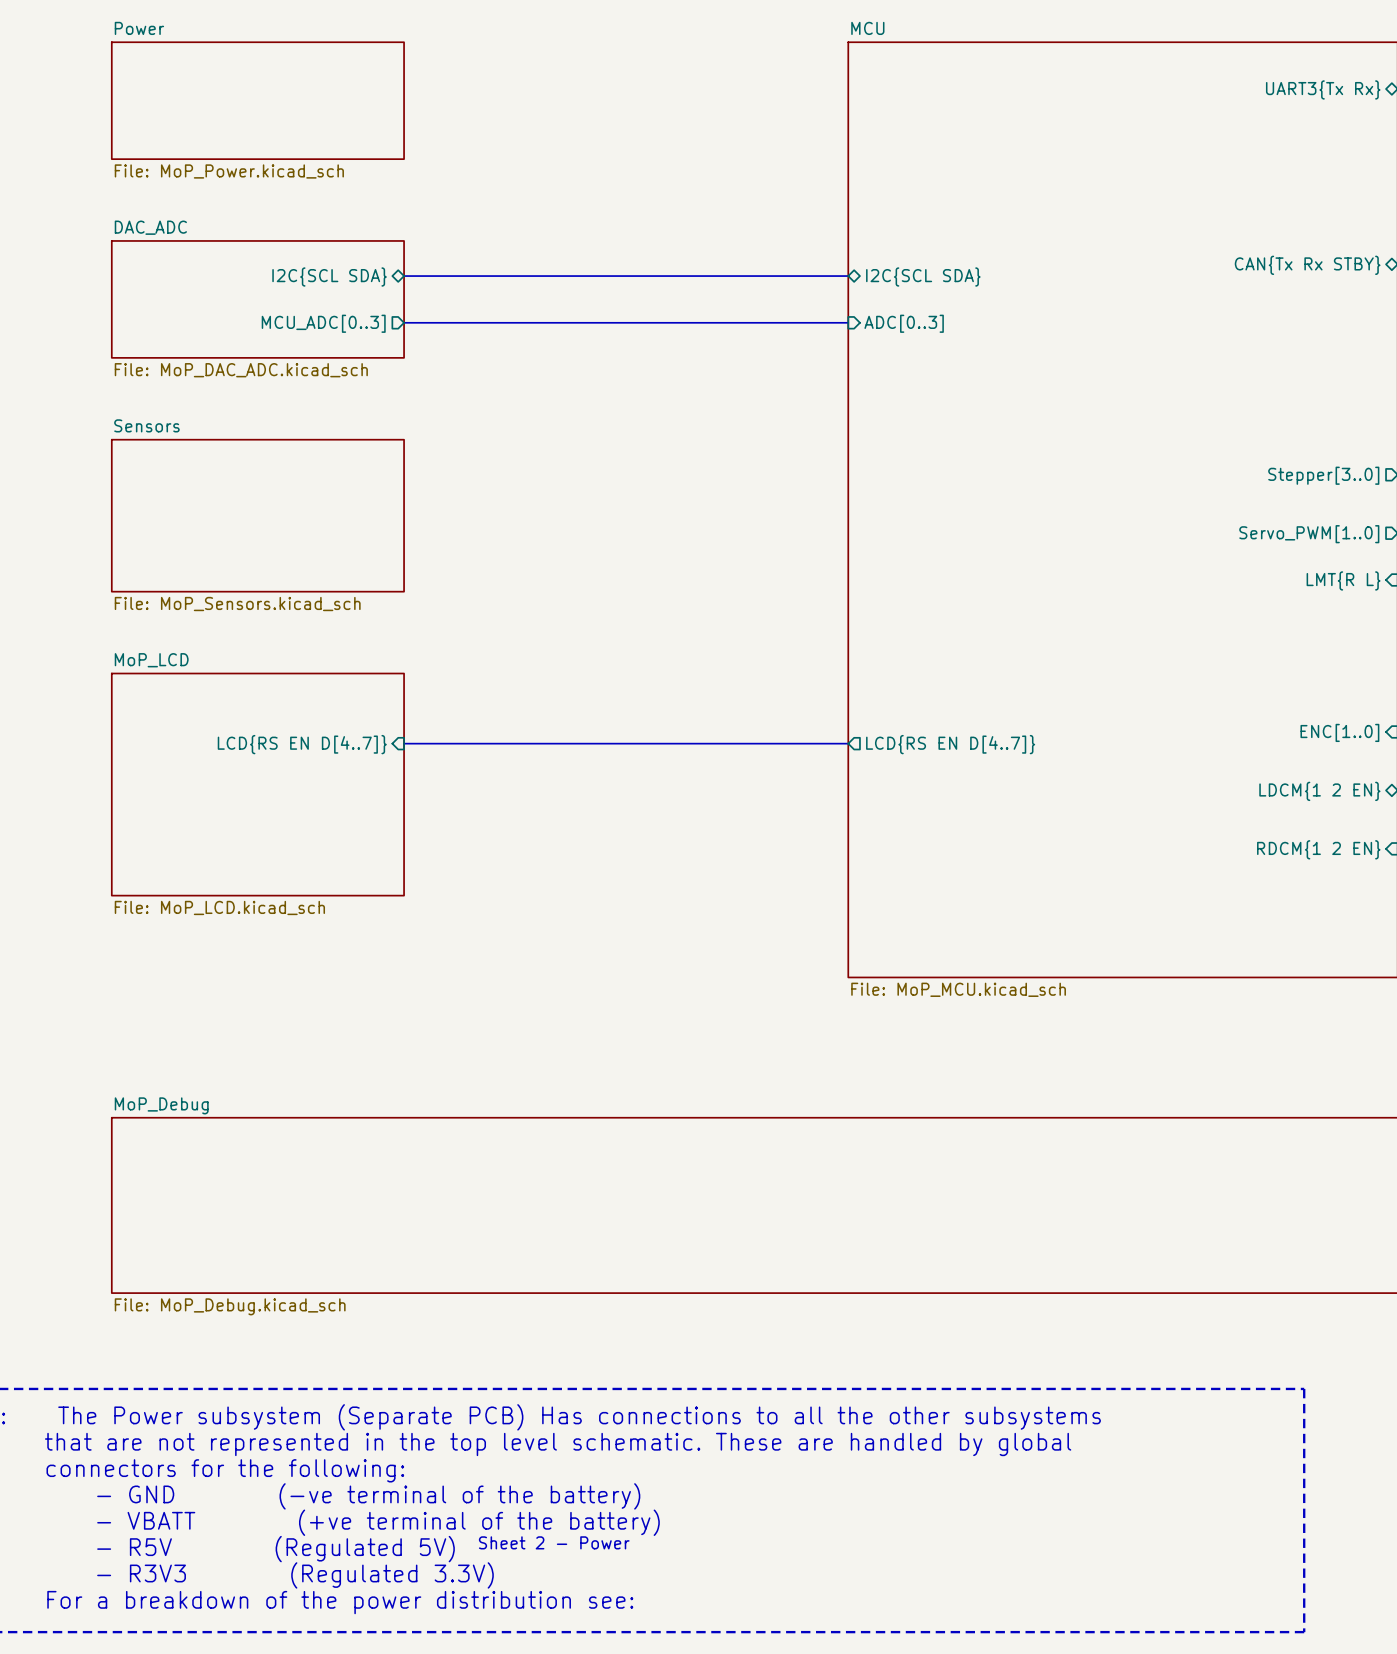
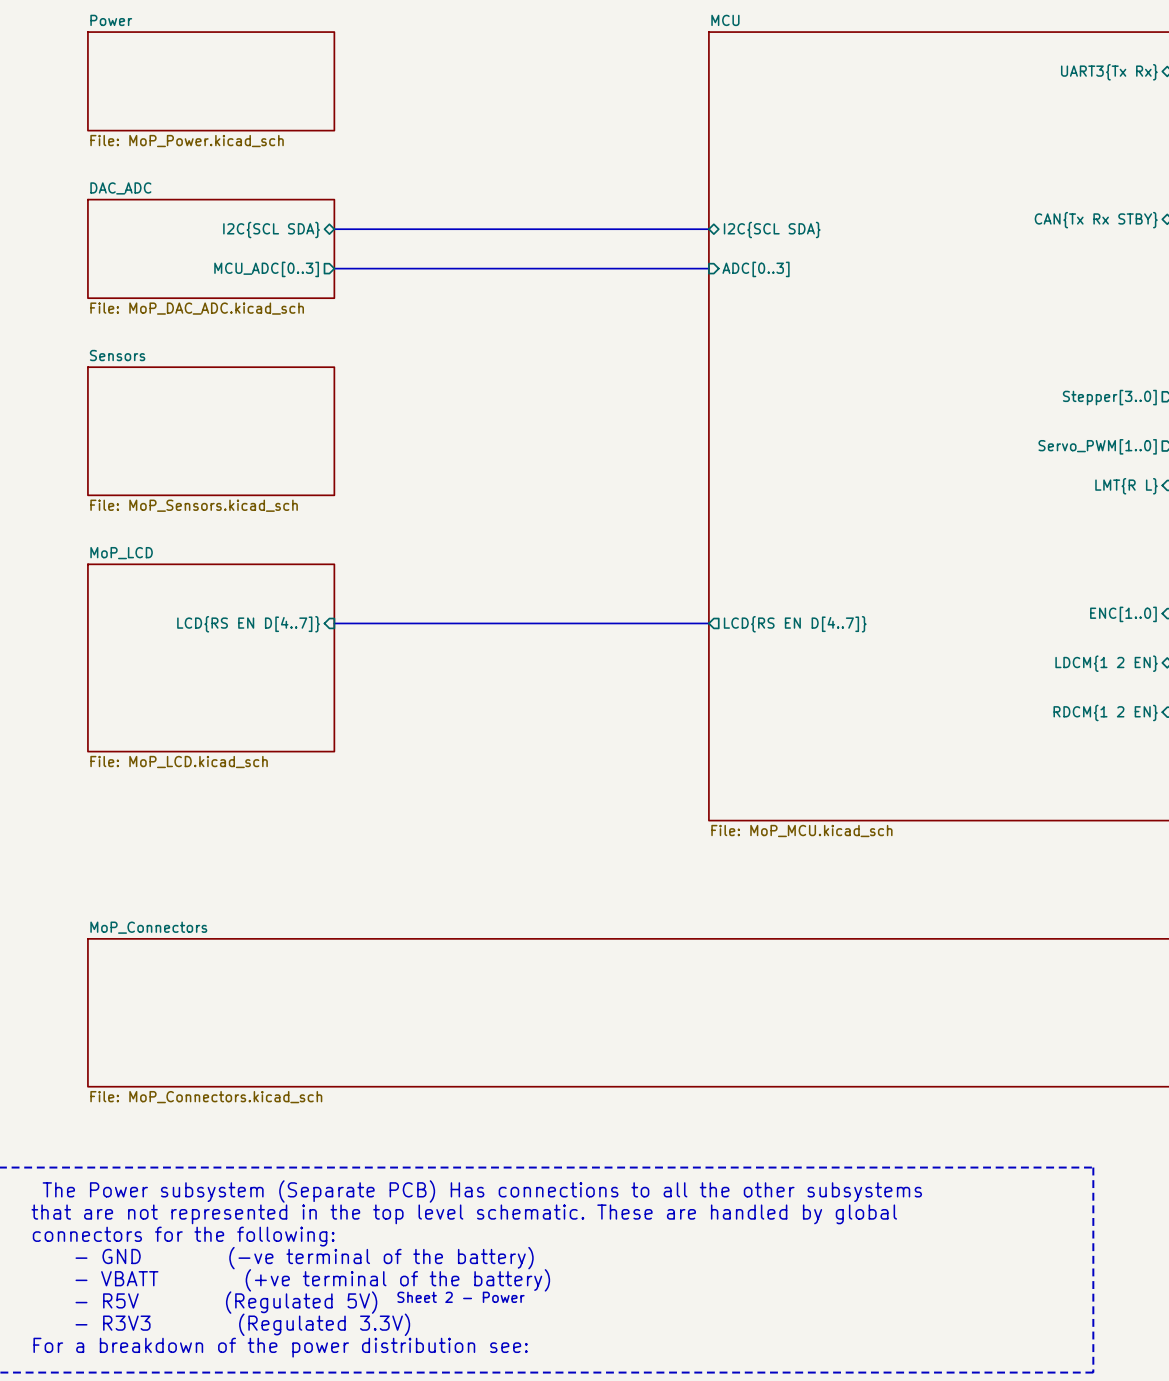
sheet MoP_Debug name: MoP_Debug (161, 1105) -> MoP_Connectors (148, 927)
sheet MoP_Debug value: File: MoP_Debug.kicad_sch (230, 1306) -> File: MoP_Connectors.kicad_sch (206, 1097)

